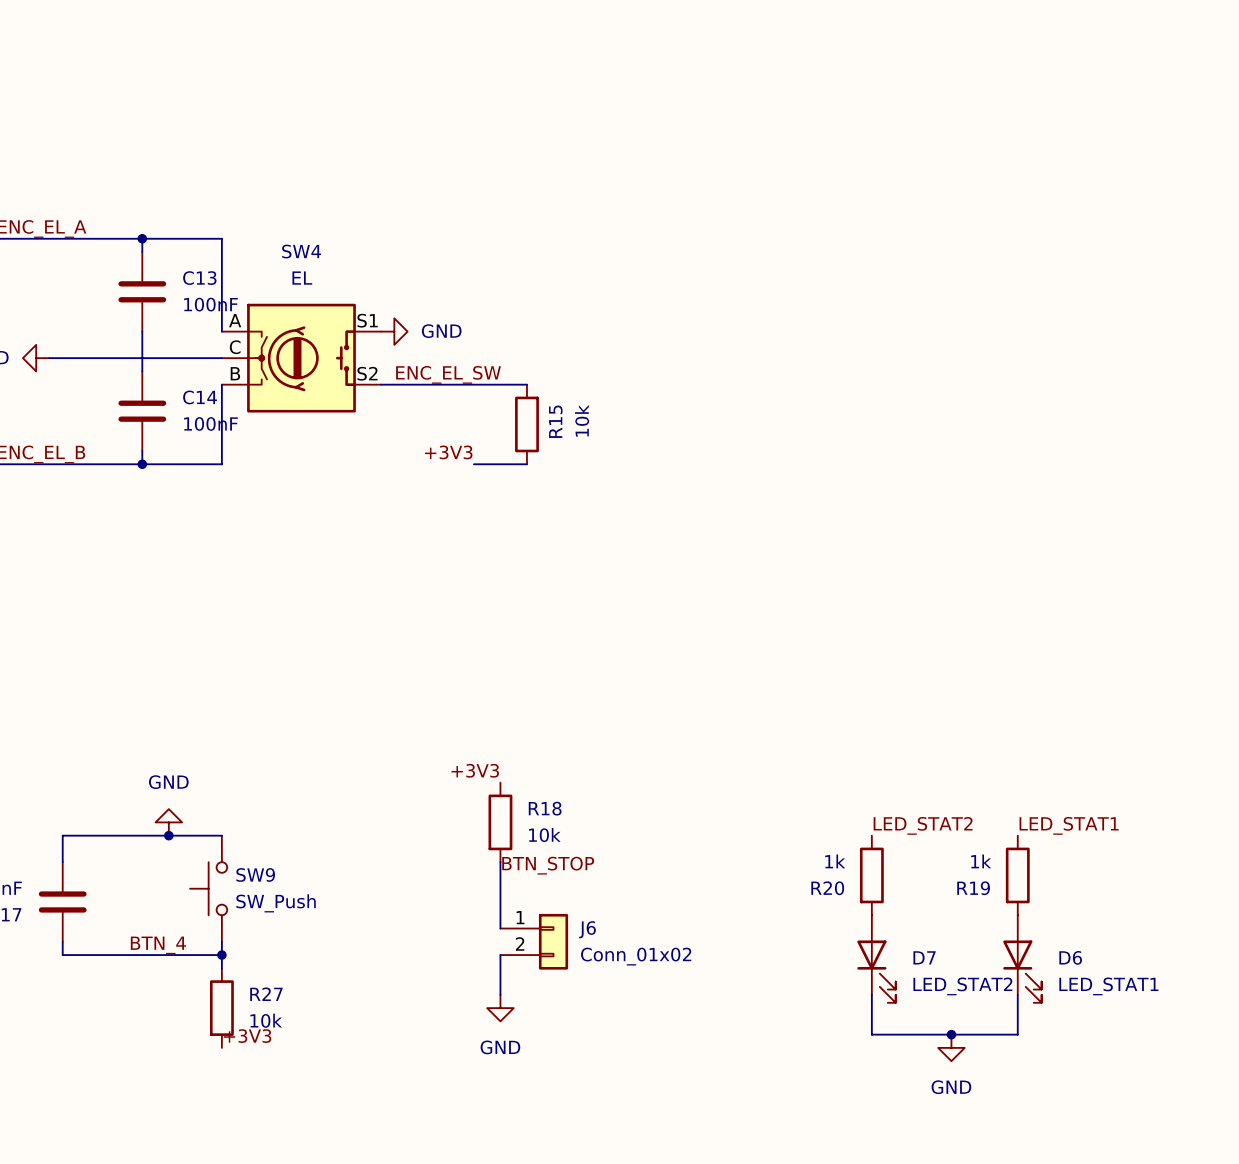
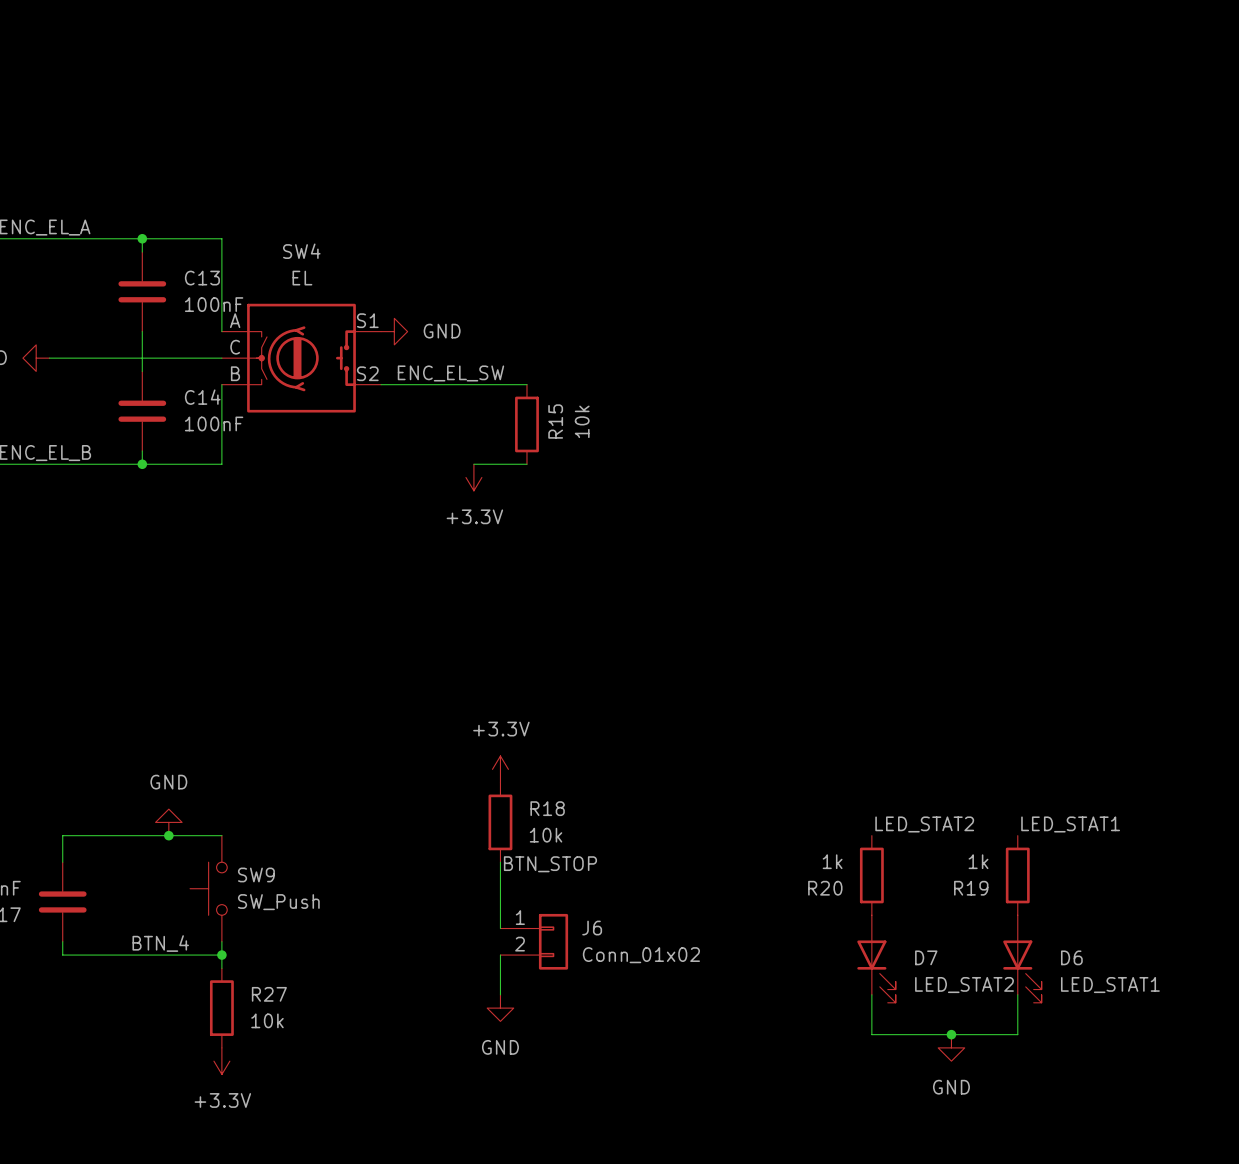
label: +3V3 (448, 452) -> none
power symbol: none -> +3.3V (473, 477)
power symbol: none -> +3.3V (500, 769)
label: +3V3 (475, 770) -> none
label: +3V3 (247, 1036) -> none
power symbol: none -> +3.3V (221, 1061)

